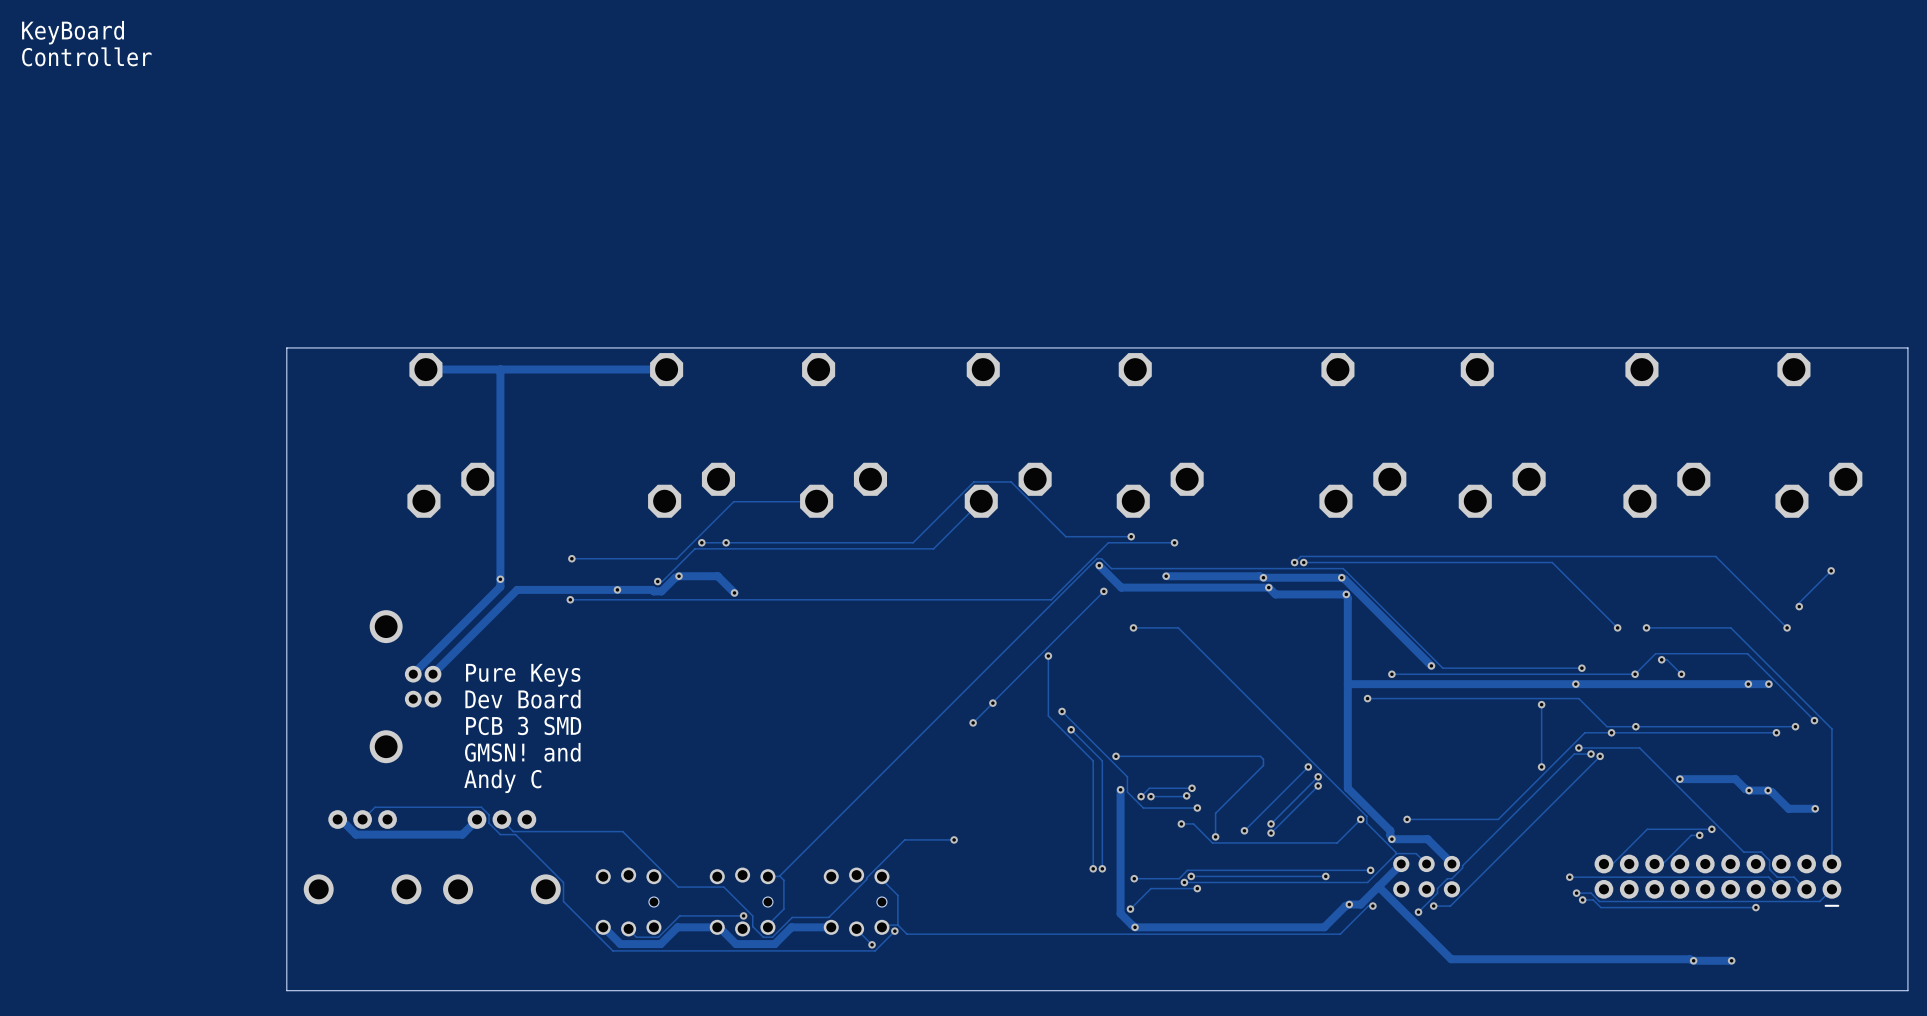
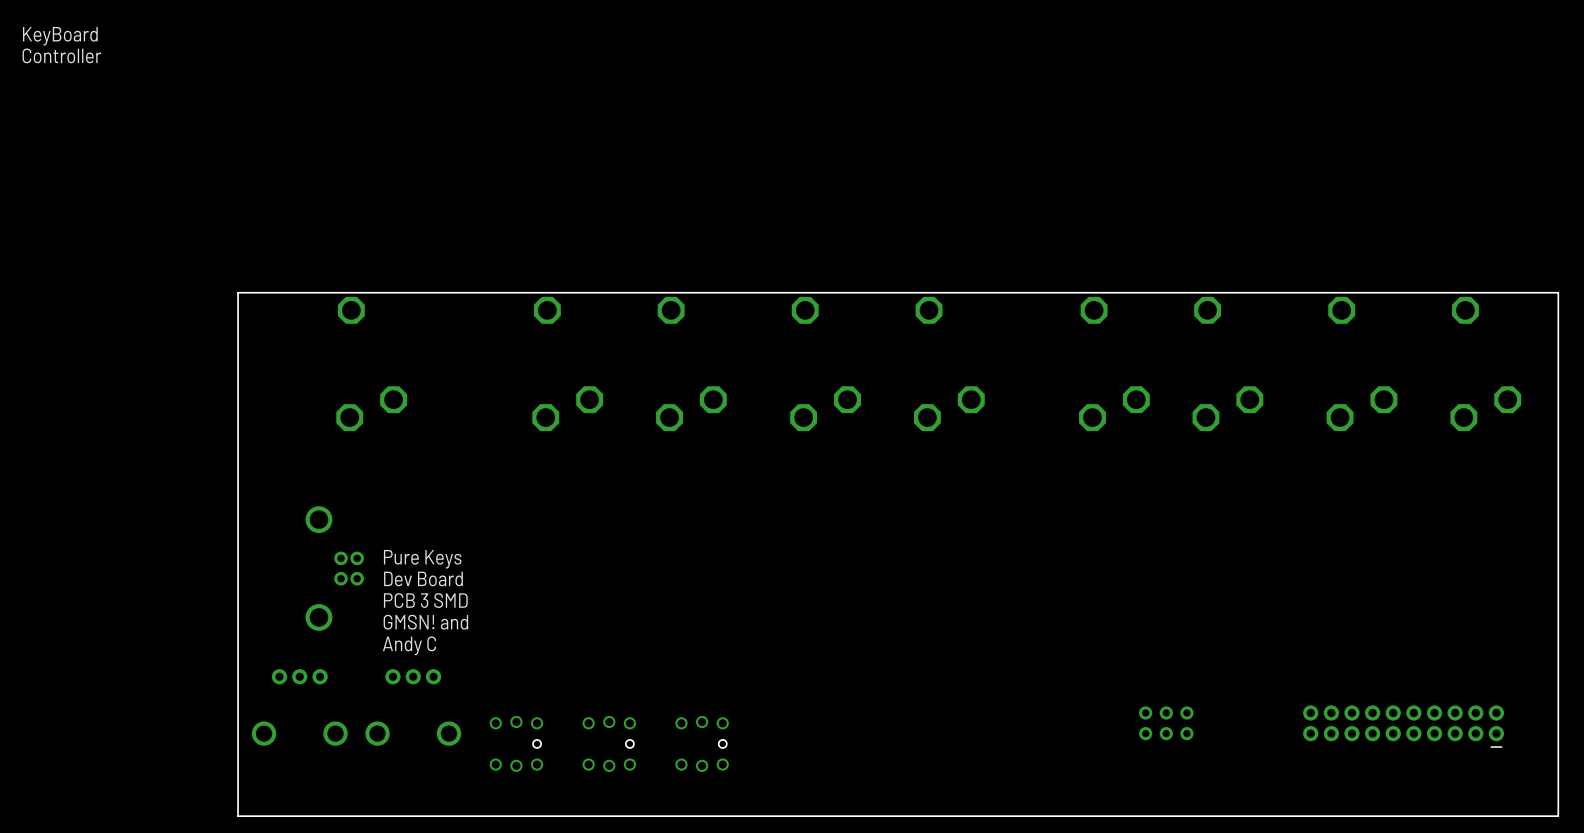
track: (425, 369) (666, 369) -> none
track: (500, 369) (500, 586) (413, 674) -> none
track: (816, 501) (733, 501) (676, 558) (571, 558) -> none
track: (981, 501) (933, 548) (694, 548) (662, 581) (657, 581) -> none
track: (1131, 536) (1065, 536) (1011, 481) (973, 481) (913, 542) (701, 542) -> none
via: (1131, 536) -> none
via: (701, 542) -> none
via: (726, 542) -> none
track: (1174, 542) (1108, 542) (1051, 599) (570, 599) -> none
via: (1174, 542) -> none
via: (571, 558) -> none
track: (1294, 562) (1300, 556) (1715, 556) (1787, 627) -> none
via: (1294, 562) -> none
track: (1303, 562) (1552, 562) (1617, 627) -> none
via: (1303, 562) -> none
track: (1099, 565) (1121, 587) (1268, 587) (1275, 594) (1346, 594) (1347, 788) (1390, 830) (1391, 839) (1427, 839) (1451, 864) -> none
via: (1099, 565) -> none
track: (1831, 570) (1799, 602) (1799, 606) -> none
via: (1831, 570) -> none
via: (679, 576) -> none
track: (1166, 576) (1341, 577) (1431, 665) -> none
via: (1166, 576) -> none
via: (1263, 577) -> none
via: (1341, 577) -> none
via: (500, 579) -> none
via: (657, 581) -> none
via: (1268, 587) -> none
via: (617, 589) -> none
track: (1103, 591) (973, 722) -> none
via: (1103, 591) -> none
track: (734, 592) (717, 576) (679, 576) (661, 591) (517, 589) (433, 674) -> none
via: (734, 592) -> none
via: (1346, 594) -> none
via: (570, 599) -> none
via: (1799, 606) -> none
track: (1133, 627) (1178, 627) (1366, 816) (1366, 823) (1396, 854) -> none
via: (1133, 627) -> none
via: (1617, 627) -> none
track: (1646, 627) (1730, 627) (1831, 728) (1831, 864) -> none
via: (1646, 627) -> none
via: (1787, 627) -> none
track: (1048, 656) (1048, 716) (1093, 760) (1093, 868) -> none
via: (1048, 656) -> none
track: (1661, 659) (1667, 659) (1681, 674) -> none
via: (1661, 659) -> none
via: (1431, 665) -> none
track: (1581, 668) (1442, 668) (1343, 568) (1111, 568) (1101, 558) (1097, 558) (779, 876) (767, 876) -> none
via: (1581, 668) -> none
track: (1391, 674) (1635, 674) (1655, 653) (1747, 653) (1814, 720) -> none
via: (1391, 674) -> none
via: (1635, 674) -> none
via: (1681, 674) -> none
via: (1575, 684) -> none
via: (1748, 684) -> none
track: (1768, 684) (1347, 684) -> none
via: (1768, 684) -> none
track: (1367, 698) (1578, 698) (1606, 726) (1795, 726) -> none
via: (1367, 698) -> none
via: (992, 703) -> none
track: (1541, 704) (1541, 766) -> none
via: (1541, 704) -> none
track: (1062, 711) (1127, 776) (1127, 792) (1143, 808) (1197, 808) -> none
via: (1062, 711) -> none
via: (1814, 720) -> none
via: (973, 722) -> none
via: (1635, 726) -> none
via: (1795, 726) -> none
track: (1071, 729) (1102, 760) (1102, 868) -> none
via: (1071, 729) -> none
via: (1611, 732) -> none
track: (1776, 732) (1584, 732) (1498, 819) (1407, 819) -> none
via: (1776, 732) -> none
track: (1578, 747) (1639, 747) (1743, 852) (1761, 852) (1769, 860) (1769, 869) (1777, 877) (1793, 877) (1806, 889) -> none
via: (1578, 747) -> none
track: (1591, 754) (1574, 754) (1451, 878) (1447, 878) (1437, 888) (1437, 893) (1418, 912) -> none
via: (1591, 754) -> none
track: (1116, 756) (1260, 756) (1263, 759) (1263, 765) (1215, 813) (1215, 836) -> none
via: (1116, 756) -> none
track: (1600, 756) (1450, 906) (1433, 906) -> none
via: (1600, 756) -> none
track: (1308, 766) (1244, 830) -> none
via: (1308, 766) -> none
via: (1541, 766) -> none
track: (1318, 776) (1271, 823) -> none
via: (1318, 776) -> none
track: (1679, 779) (1735, 779) (1749, 790) (1771, 792) (1788, 808) (1815, 808) -> none
via: (1679, 779) -> none
track: (1318, 785) (1271, 833) -> none
via: (1318, 785) -> none
track: (1192, 788) (1149, 788) (1141, 796) -> none
via: (1192, 788) -> none
track: (1120, 789) (1120, 913) (1135, 927) (1324, 927) (1345, 906) (1360, 904) (1401, 864) -> none
via: (1120, 789) -> none
via: (1749, 790) -> none
via: (1768, 790) -> none
track: (1186, 795) (1150, 796) -> none
via: (1186, 795) -> none
via: (1141, 796) -> none
via: (1150, 796) -> none
via: (1197, 808) -> none
via: (1815, 808) -> none
track: (362, 819) (375, 807) (481, 807) (489, 814) (489, 823) (500, 834) (515, 834) (563, 882) (563, 901) (612, 950) (875, 950) (894, 931) -> none
track: (477, 819) (462, 834) (356, 834) (341, 820) (337, 819) -> none
track: (501, 819) (513, 831) (622, 831) (678, 887) (723, 887) (752, 915) (752, 926) (763, 937) (772, 937) (792, 917) (828, 917) (904, 839) (954, 839) -> none
track: (1360, 819) (1337, 842) (1212, 842) (1193, 823) (1181, 823) -> none
via: (1360, 819) -> none
via: (1407, 819) -> none
via: (1181, 823) -> none
via: (1271, 823) -> none
track: (1711, 829) (1647, 829) (1613, 863) (1603, 864) -> none
via: (1711, 829) -> none
via: (1244, 830) -> none
via: (1271, 833) -> none
track: (1699, 835) (1691, 835) (1663, 863) (1654, 864) -> none
via: (1699, 835) -> none
via: (1215, 836) -> none
via: (954, 839) -> none
via: (1391, 839) -> none
track: (1426, 864) (1416, 853) (1396, 853) (1367, 882) (1184, 882) -> none
via: (1093, 868) -> none
via: (1102, 868) -> none
track: (1370, 870) (1187, 870) (1179, 878) (1134, 878) -> none
via: (1370, 870) -> none
track: (779, 876) (783, 880) (783, 909) (767, 925) (767, 927) -> none
track: (881, 876) (881, 879) (897, 895) (897, 925) -> none
via: (1191, 876) -> none
track: (1325, 876) (1191, 876) -> none
via: (1325, 876) -> none
track: (1569, 877) (1768, 877) (1781, 889) -> none
via: (1569, 877) -> none
via: (1134, 878) -> none
via: (1184, 882) -> none
track: (1378, 886) (1451, 959) (1731, 960) -> none
track: (1197, 888) (1150, 888) (1130, 909) -> none
via: (1197, 888) -> none
track: (1831, 889) (1819, 901) (1599, 901) (1591, 893) (1576, 893) -> none
via: (1576, 893) -> none
track: (1582, 899) (1593, 899) (1600, 907) (1755, 907) -> none
via: (1582, 899) -> none
via: (1349, 904) -> none
track: (1372, 906) (1368, 906) (1340, 934) (907, 934) (897, 925) -> none
via: (1372, 906) -> none
via: (1433, 906) -> none
via: (1755, 907) -> none
via: (1130, 909) -> none
via: (1418, 912) -> none
track: (743, 915) (679, 915) (658, 937) (636, 937) (628, 928) -> none
via: (743, 915) -> none
track: (897, 925) (884, 925) (881, 927) -> none
track: (831, 927) (791, 927) (774, 944) (736, 944) (717, 927) (677, 927) (660, 944) (620, 944) (603, 927) -> none
via: (1135, 927) -> none
track: (856, 928) (872, 944) -> none
via: (894, 931) -> none
via: (872, 944) -> none
via: (1693, 960) -> none
via: (1731, 960) -> none

